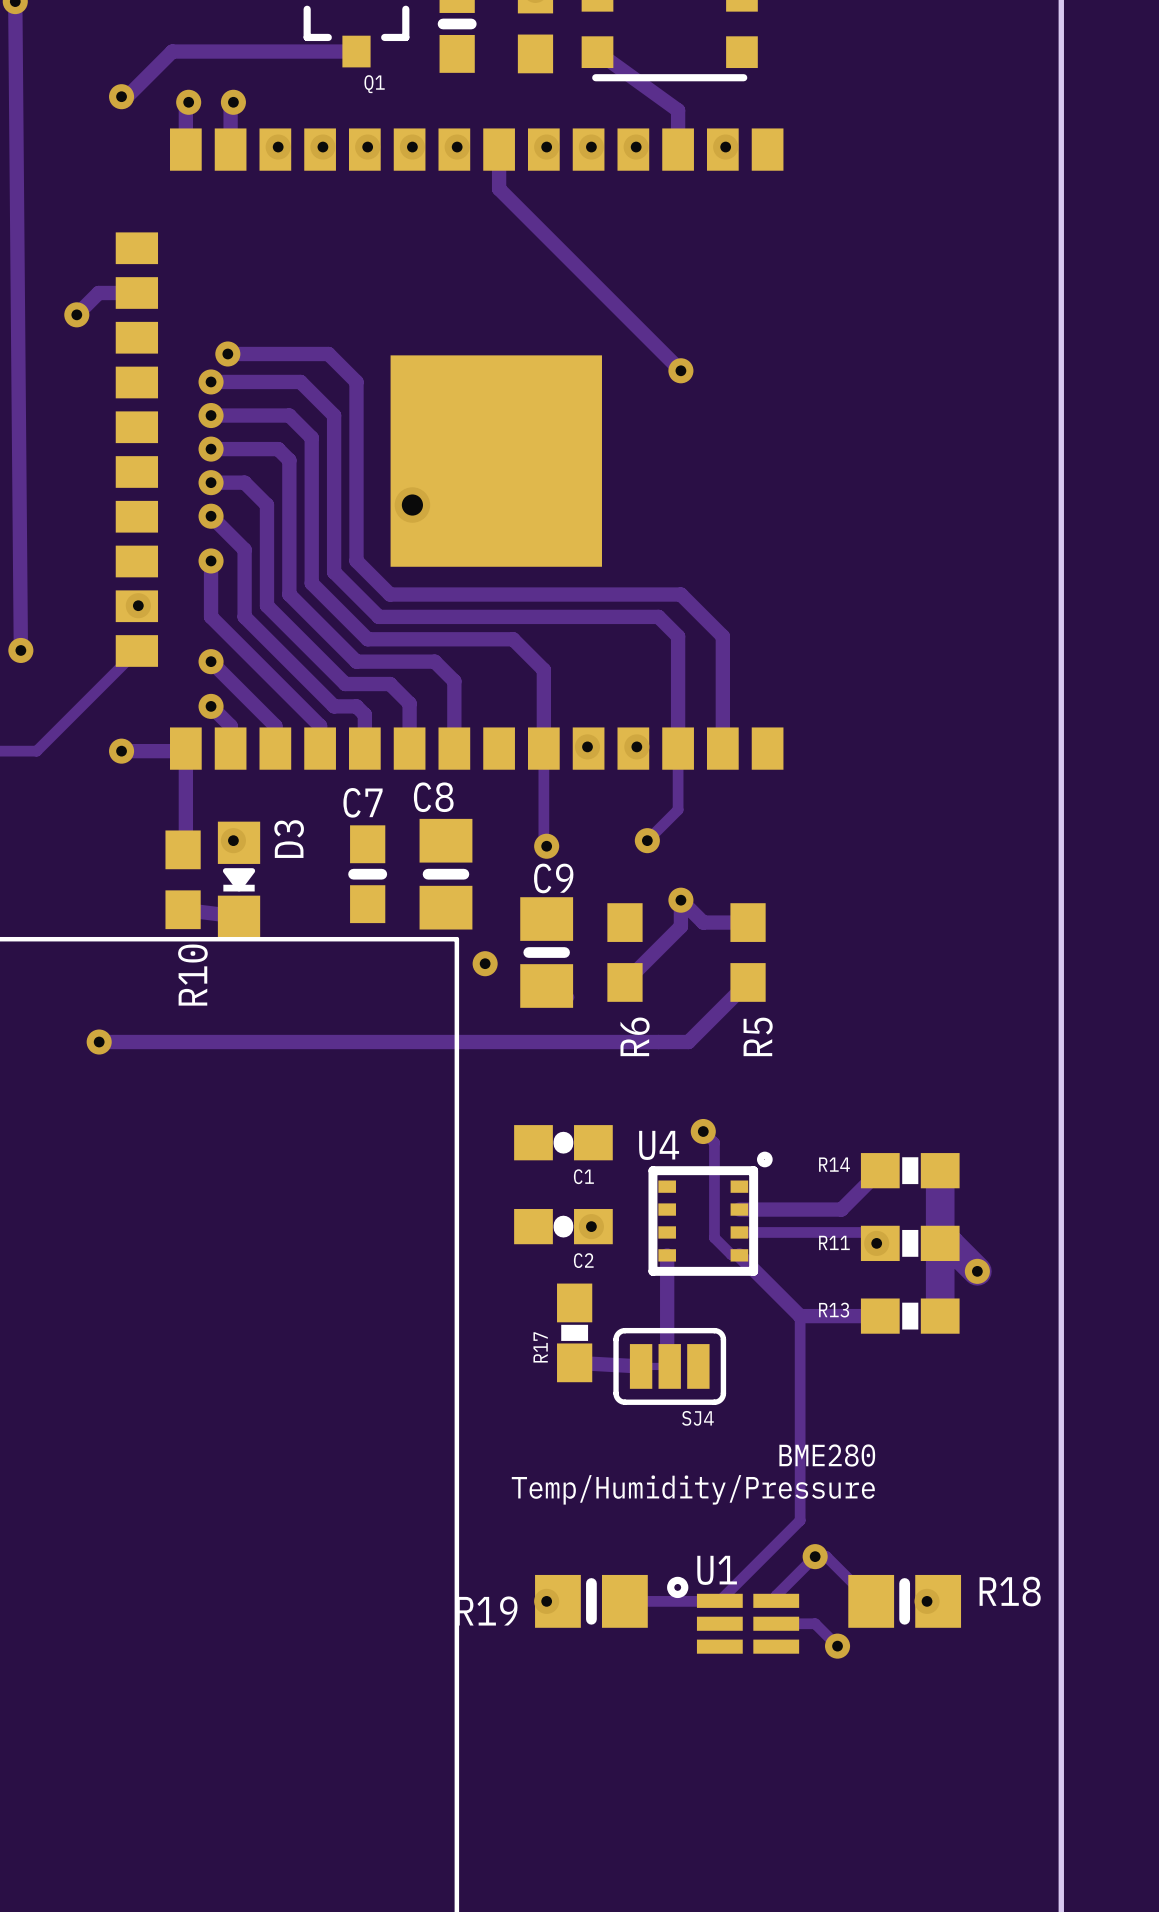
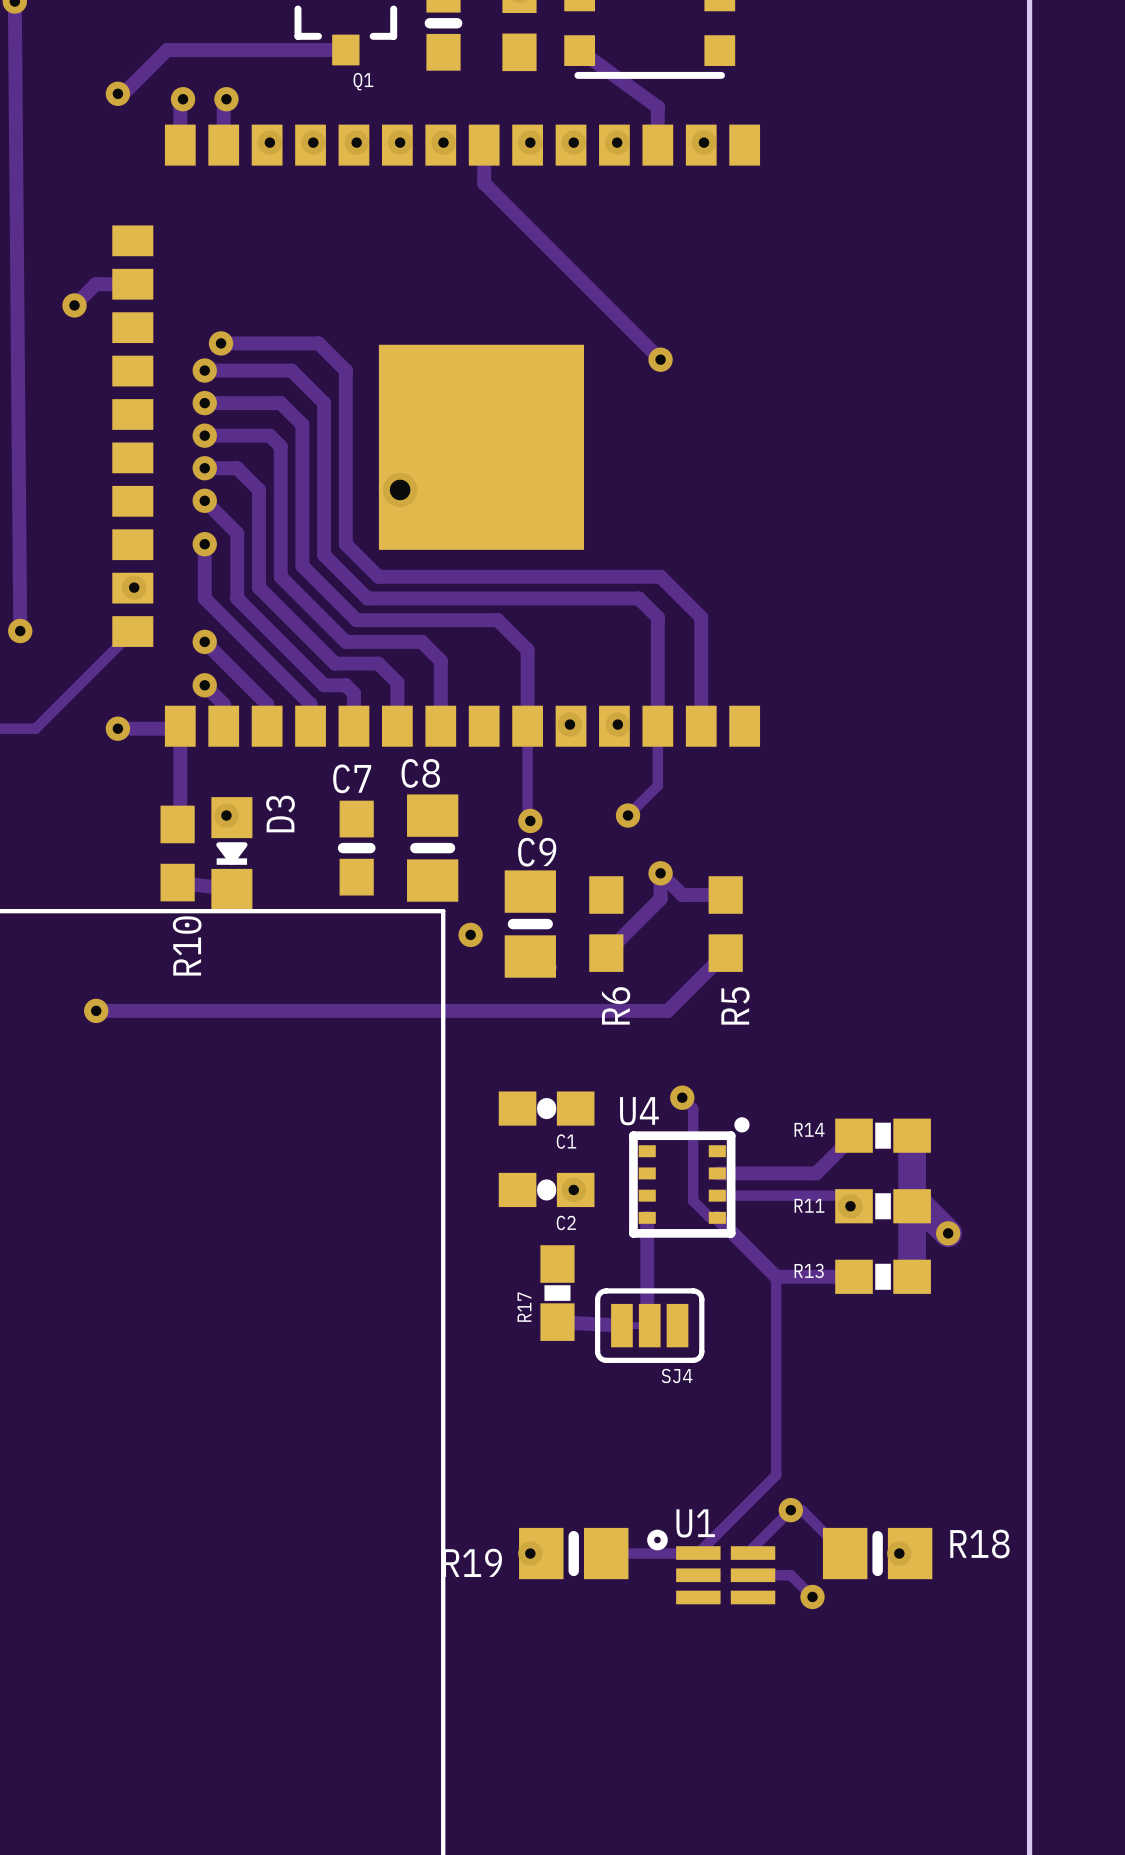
text: BME280 (827, 1455) -> none
text: Temp/Humidity/Pressure (693, 1489) -> none

